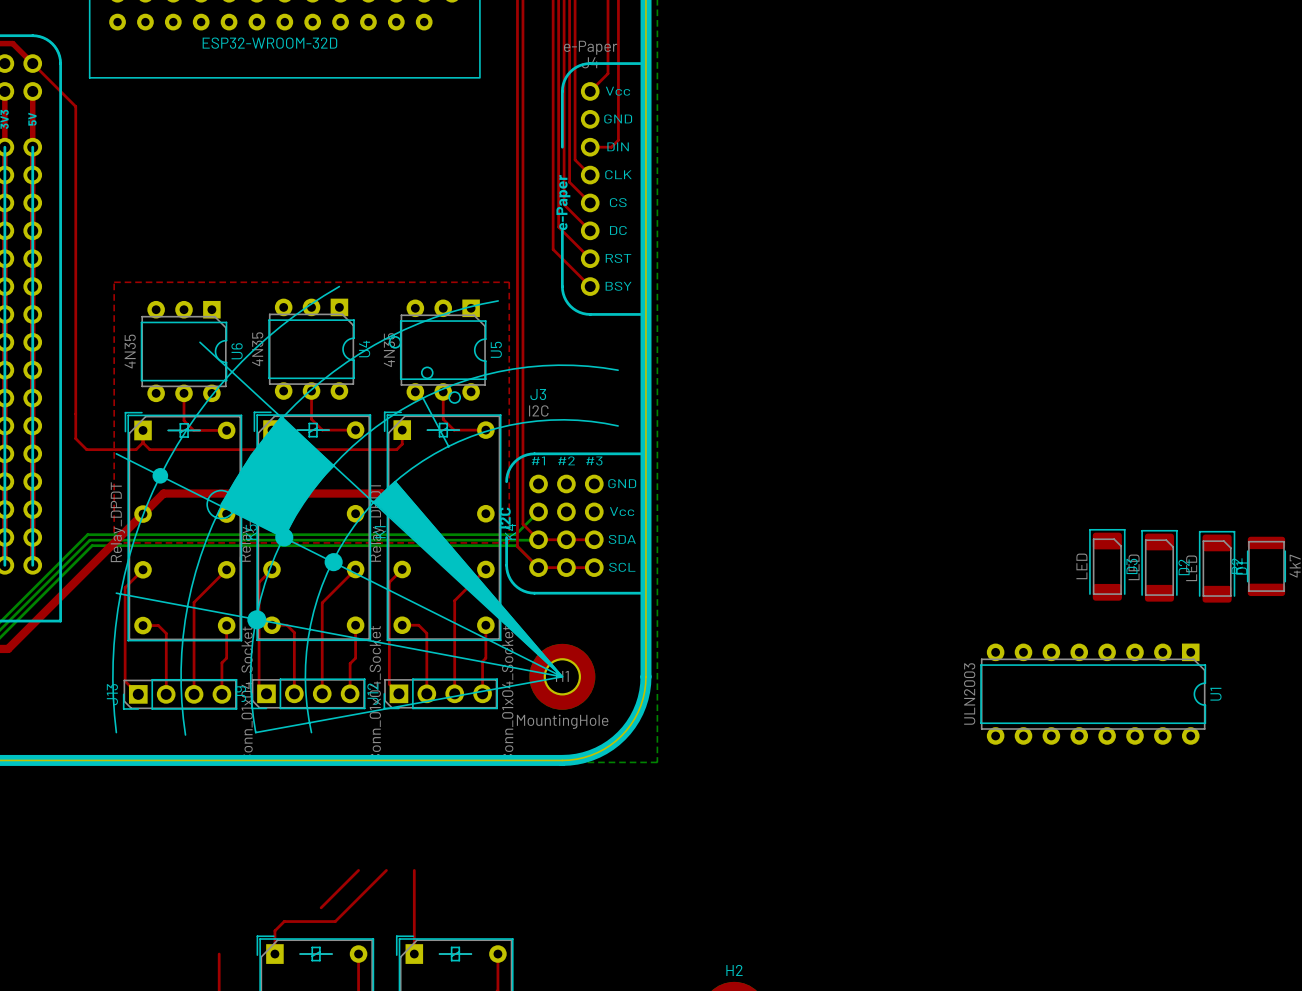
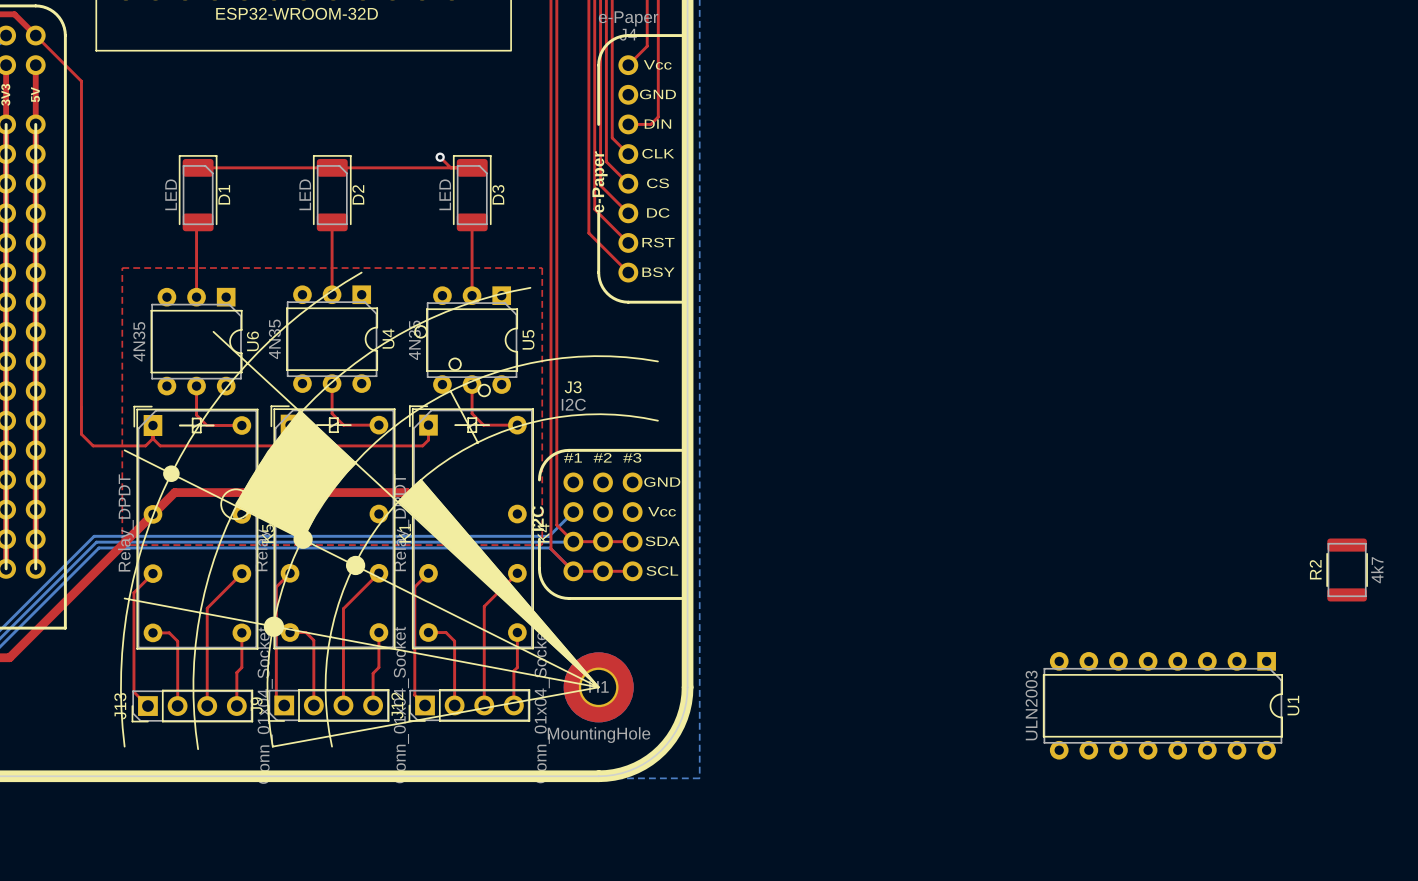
top track: none -> (440, 157) (450, 167)
via: none -> (440, 157)
top track: none -> (198, 167) (472, 167)
top track: none -> (198, 222) (196, 223) (196, 297)
top track: none -> (332, 222) (332, 294)
top track: none -> (472, 222) (472, 295)
D3 position: (1107, 564) -> (472, 193)
D2 position: (1159, 565) -> (332, 193)
D1 position: (1217, 566) -> (198, 193)

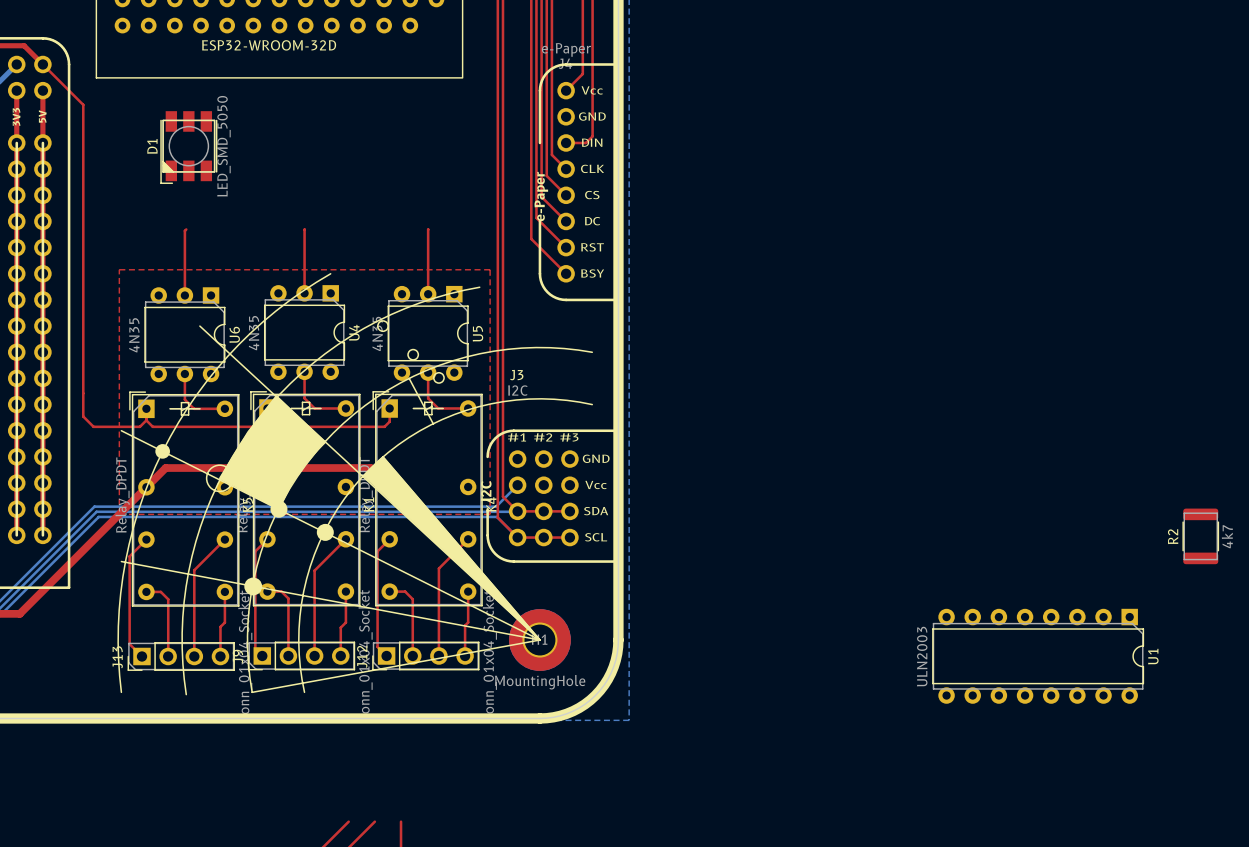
D1 footprint: [178, 155, 218, 232] -> [160, 111, 218, 184]
top track: (440, 157) (450, 167) -> none
via: (440, 157) -> none
top track: (198, 167) (472, 167) -> none
D2: LED (332, 193) -> none
D3: LED (472, 193) -> none
D1 value: LED (171, 194) -> LED_SMD_5050 (224, 146)
D1 name position: D1 (224, 194) -> D1 (152, 146)

